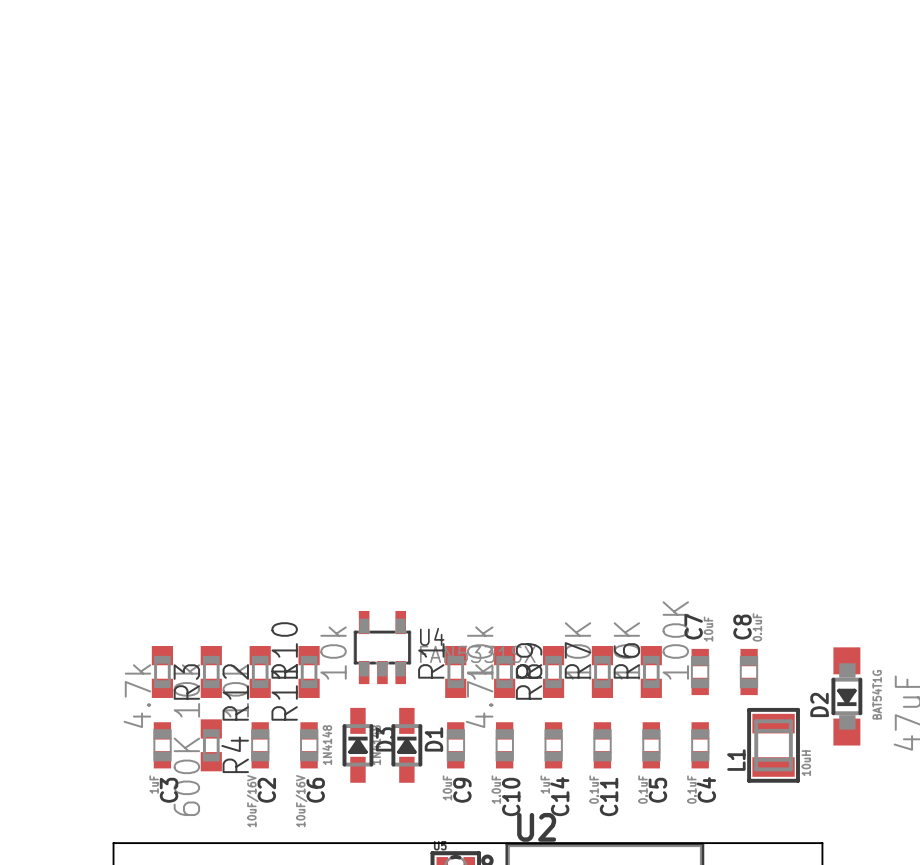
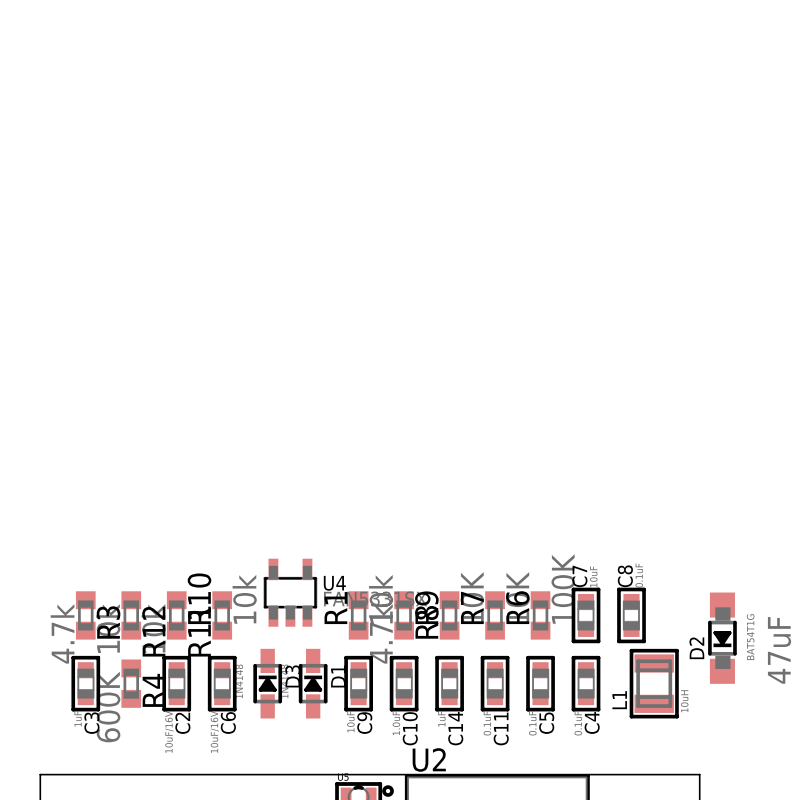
C7 footprint: [690, 648, 710, 696] -> [571, 587, 601, 644]
C8 footprint: [739, 648, 759, 696] -> [617, 587, 646, 644]
C3 footprint: [153, 722, 172, 769] -> [71, 655, 101, 712]
C2 footprint: [251, 722, 270, 769] -> [162, 655, 192, 712]
C6 footprint: [300, 722, 319, 769] -> [207, 655, 237, 712]
C9 footprint: [446, 722, 466, 769] -> [344, 655, 373, 712]
C10 footprint: [495, 722, 514, 769] -> [389, 655, 419, 712]
C14 footprint: [544, 722, 563, 769] -> [435, 655, 464, 712]
C11 footprint: [593, 722, 612, 769] -> [480, 655, 510, 712]
C5 footprint: [642, 722, 661, 769] -> [526, 655, 555, 712]
C4 footprint: [691, 722, 710, 769] -> [571, 655, 601, 712]

